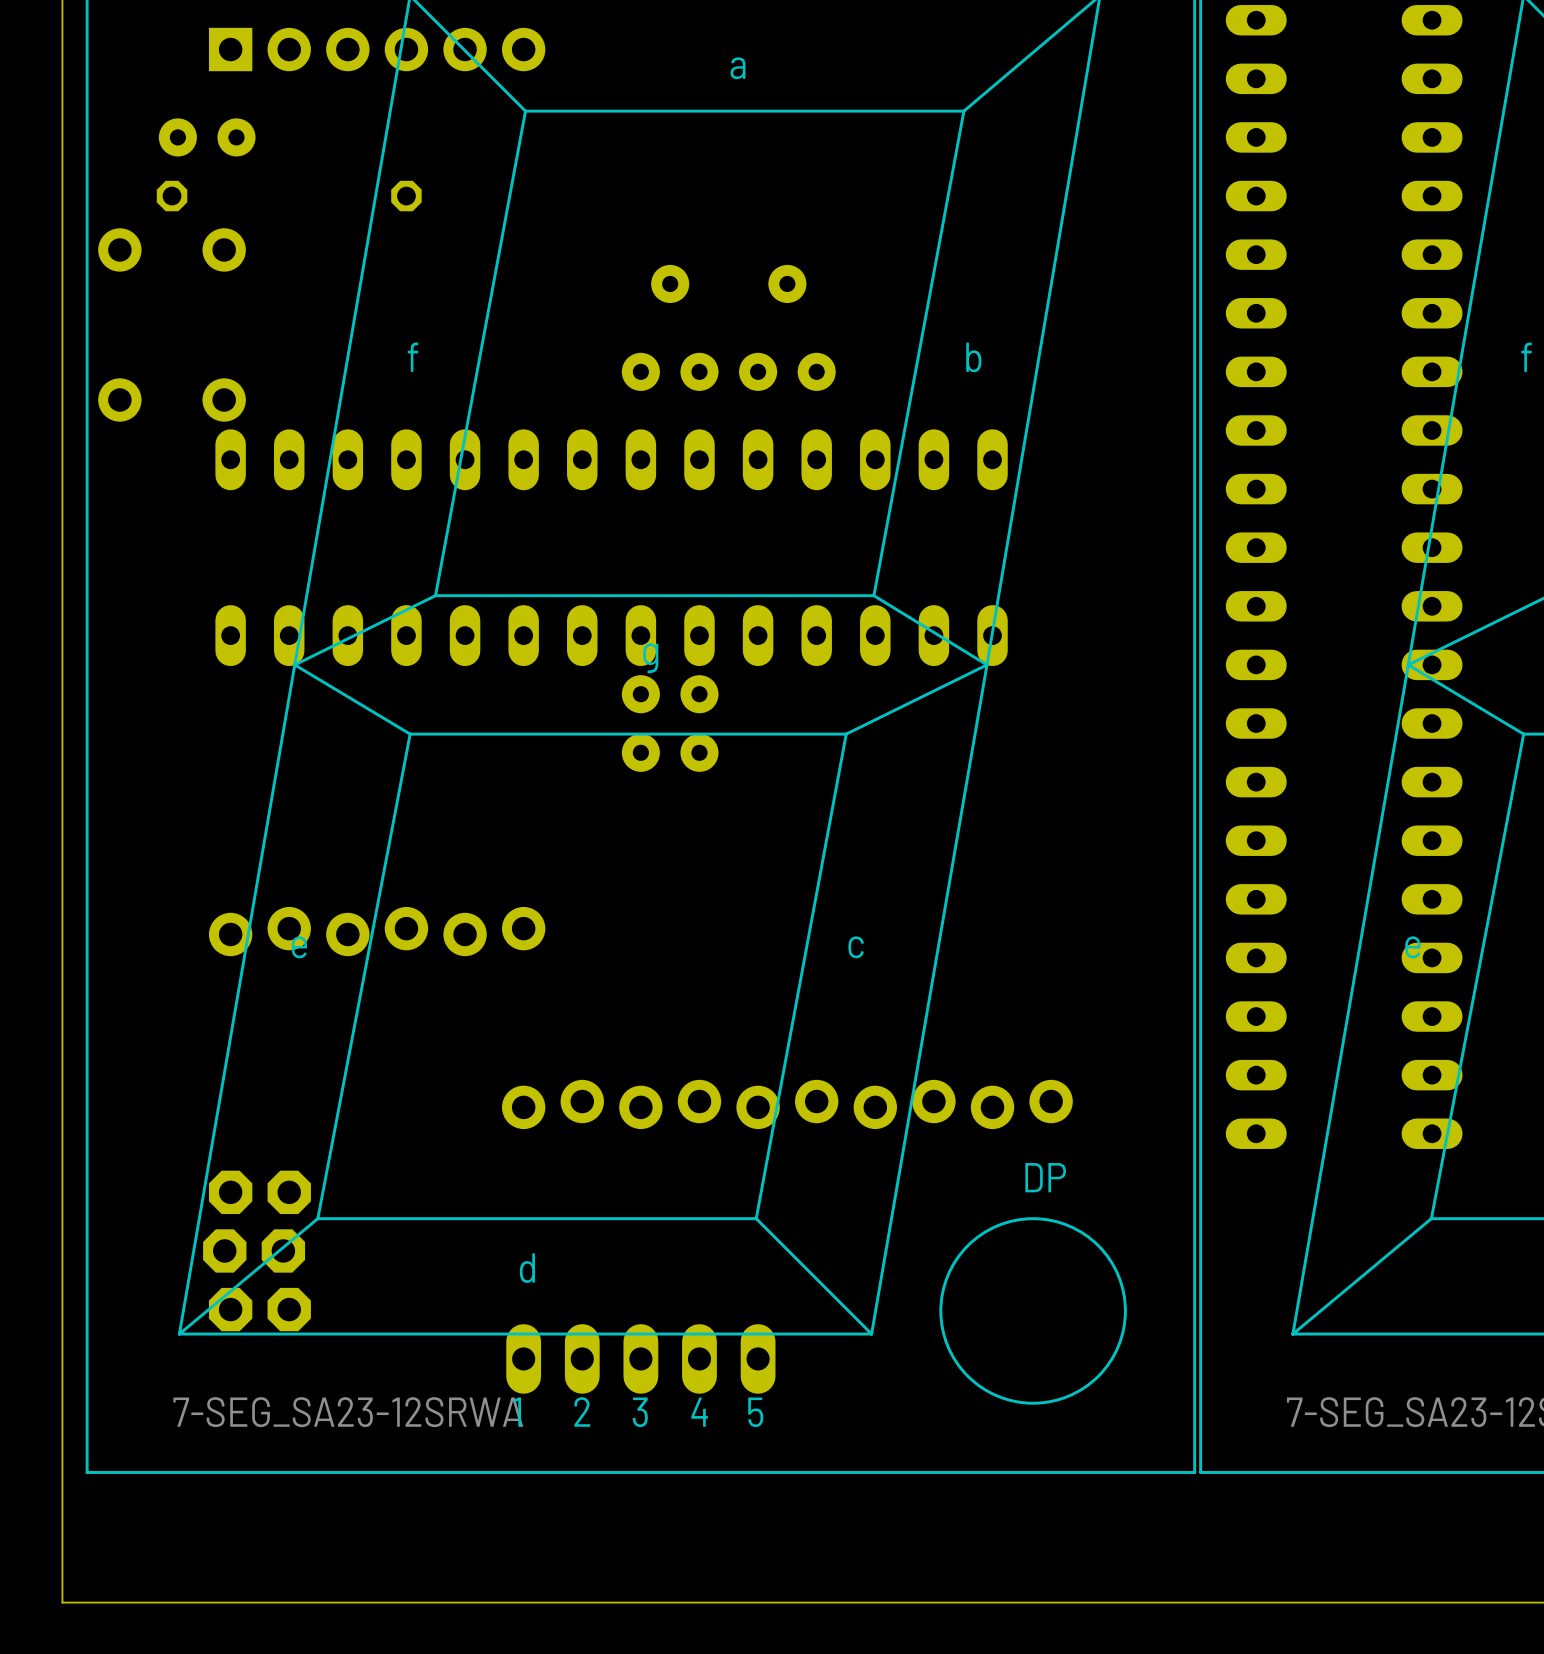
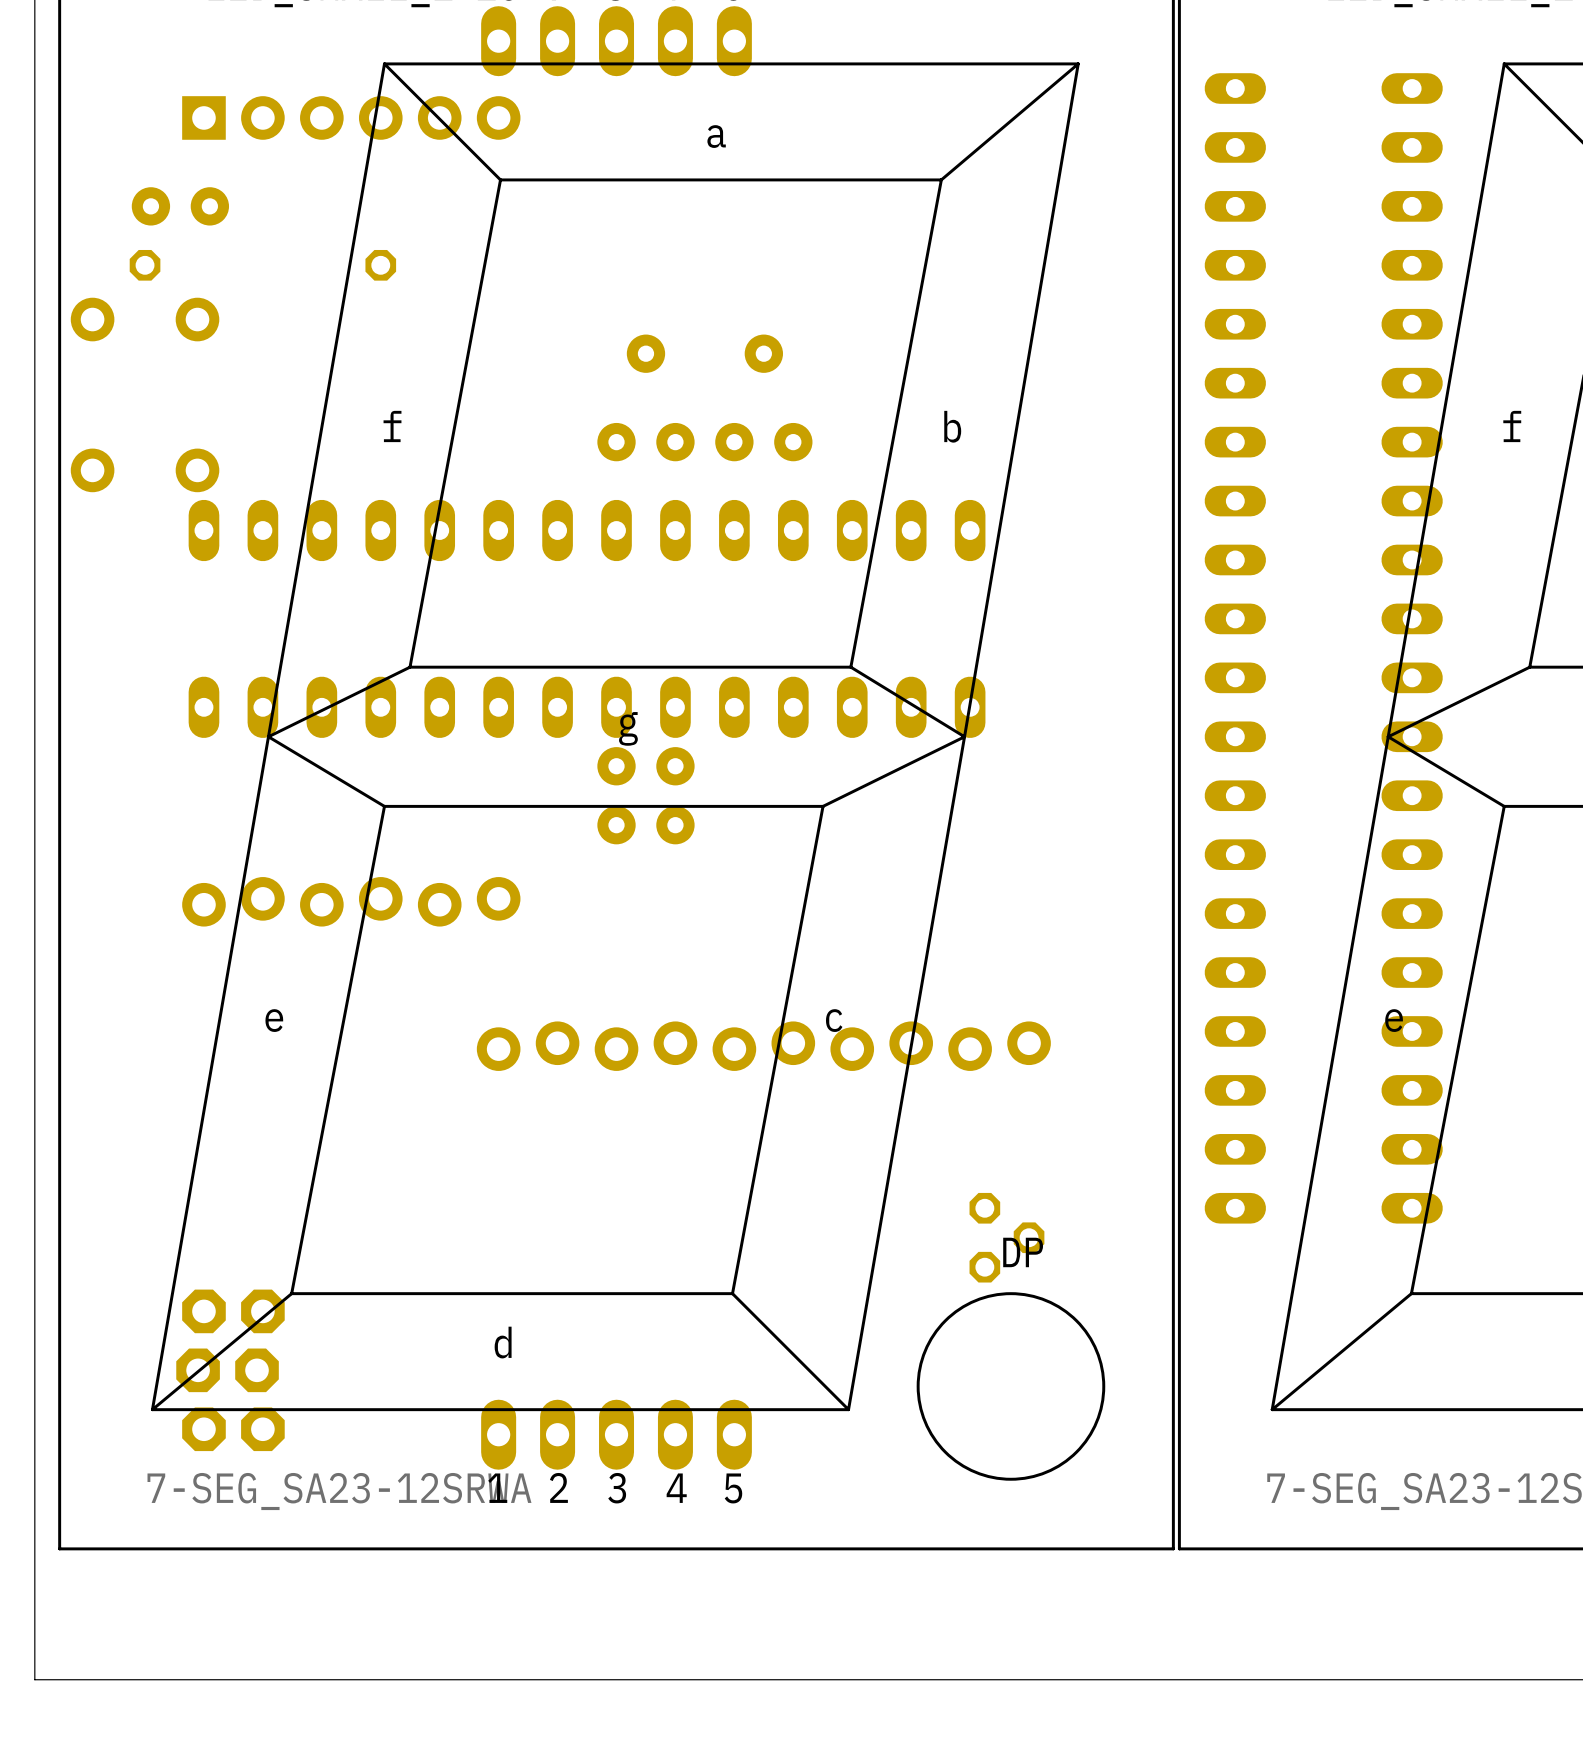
part position: (377, 931) -> (351, 901)
part position: (787, 1104) -> (763, 1046)
part: none -> (1006, 1237)
part position: (257, 1250) -> (230, 1370)

